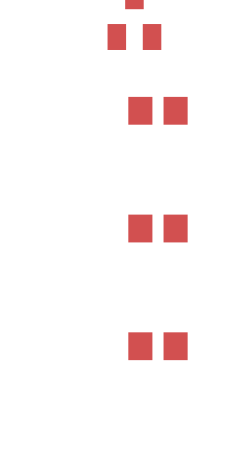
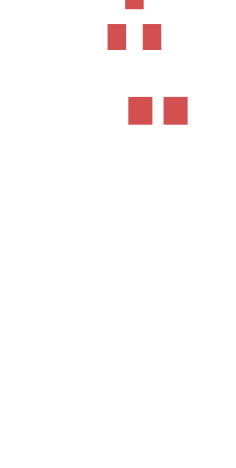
part: (157, 228) -> none
part: (157, 346) -> none

